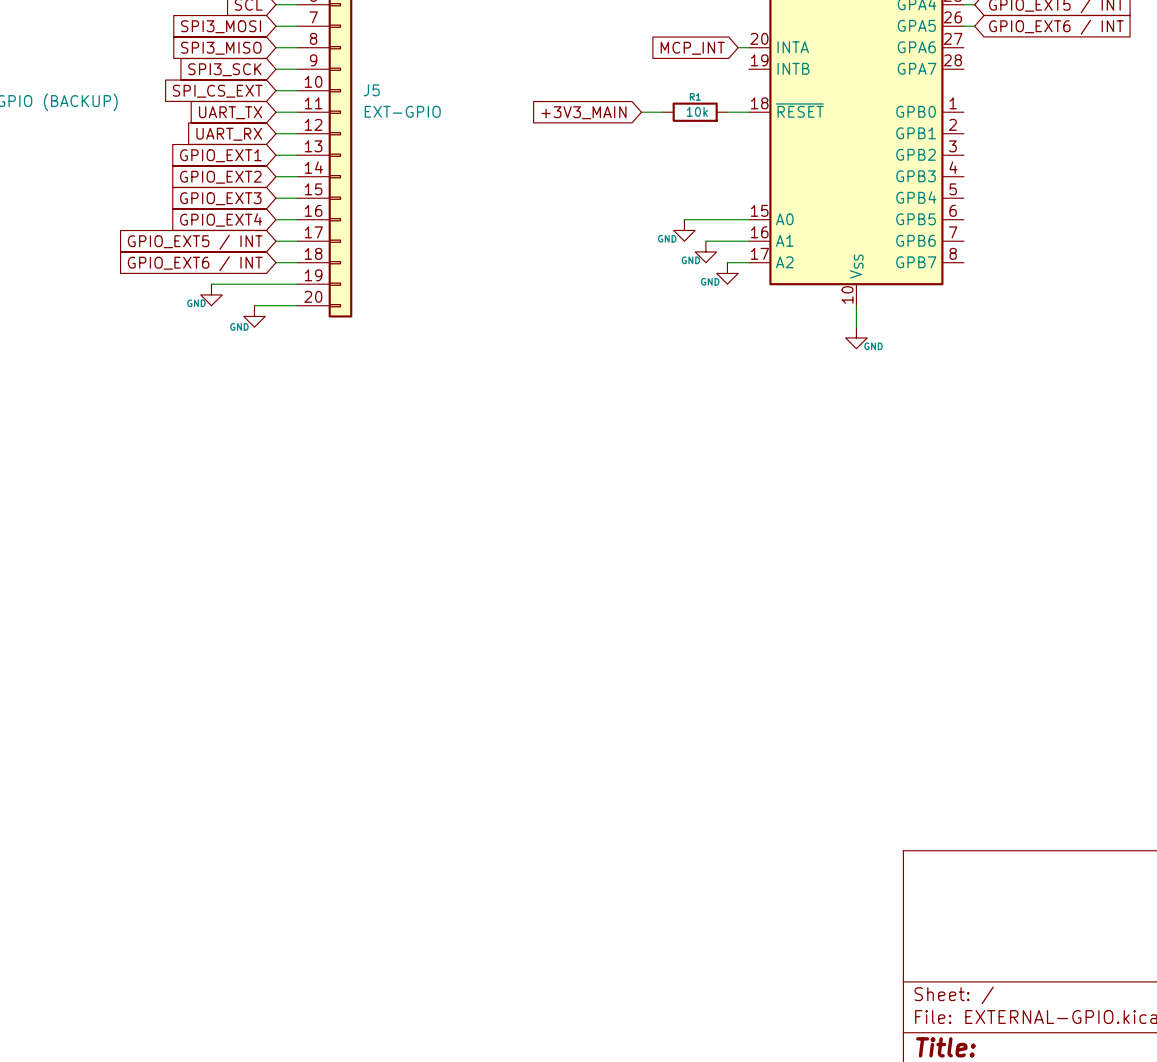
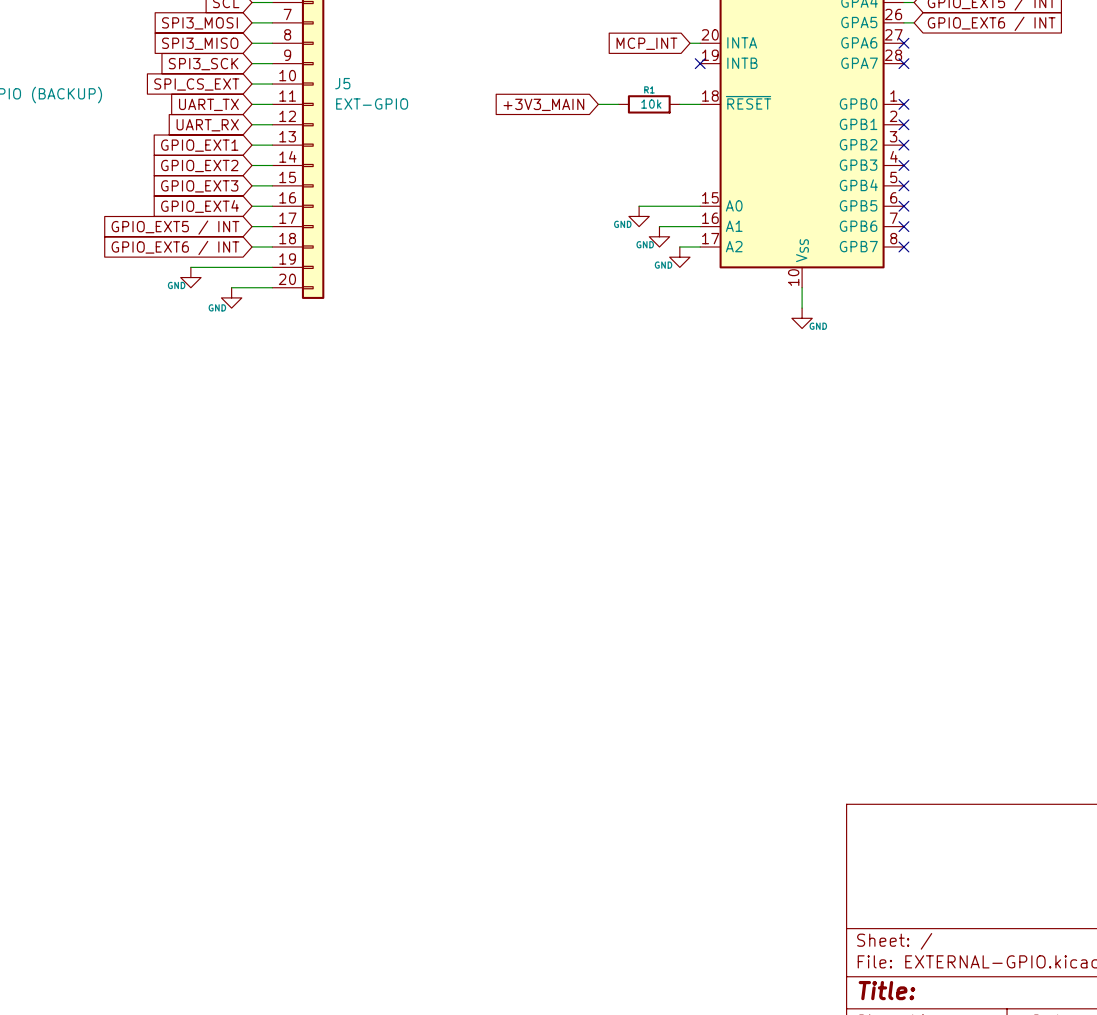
no-connect mark: none -> (903, 43)
no-connect mark: none -> (700, 63)
no-connect mark: none -> (903, 63)
no-connect mark: none -> (903, 104)
no-connect mark: none -> (903, 124)
no-connect mark: none -> (903, 145)
no-connect mark: none -> (903, 165)
no-connect mark: none -> (903, 185)
no-connect mark: none -> (903, 206)
no-connect mark: none -> (903, 226)
no-connect mark: none -> (903, 246)

